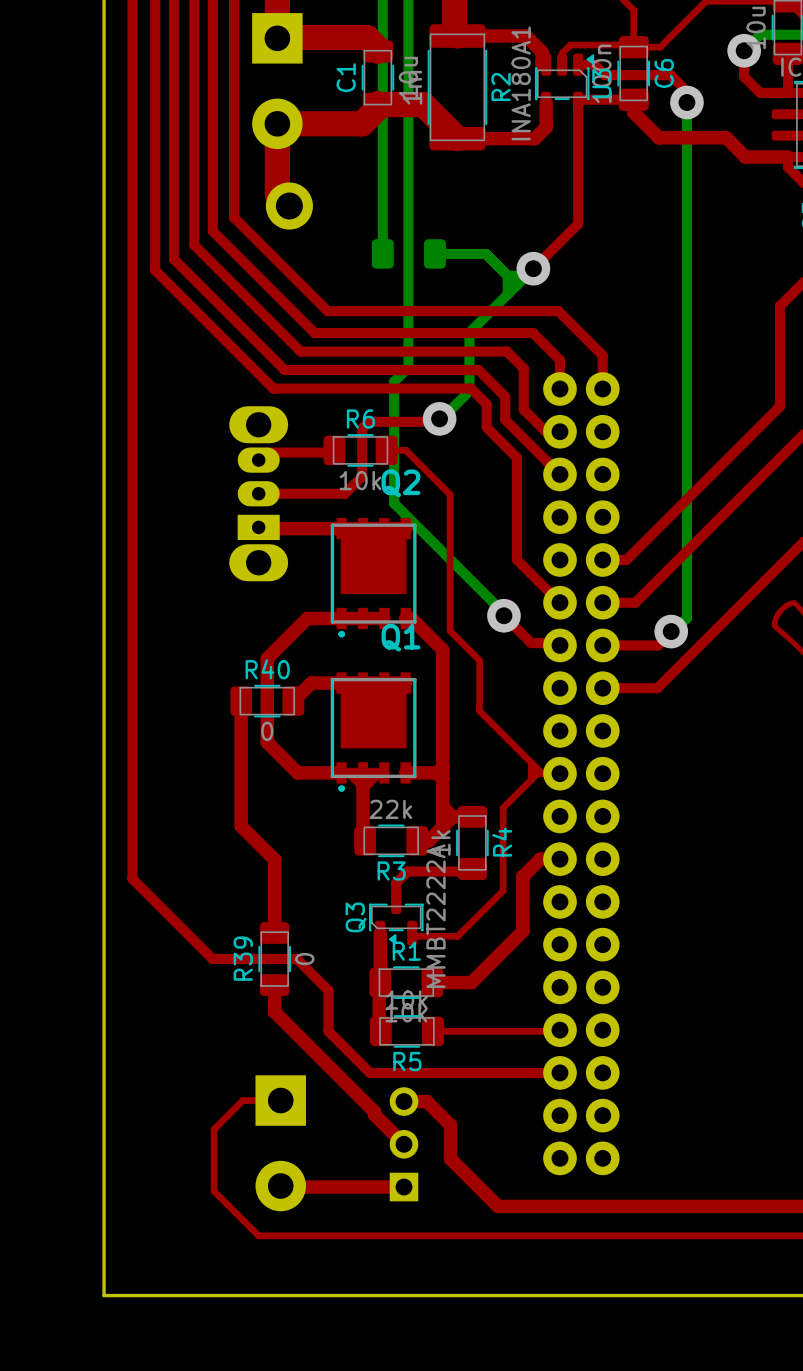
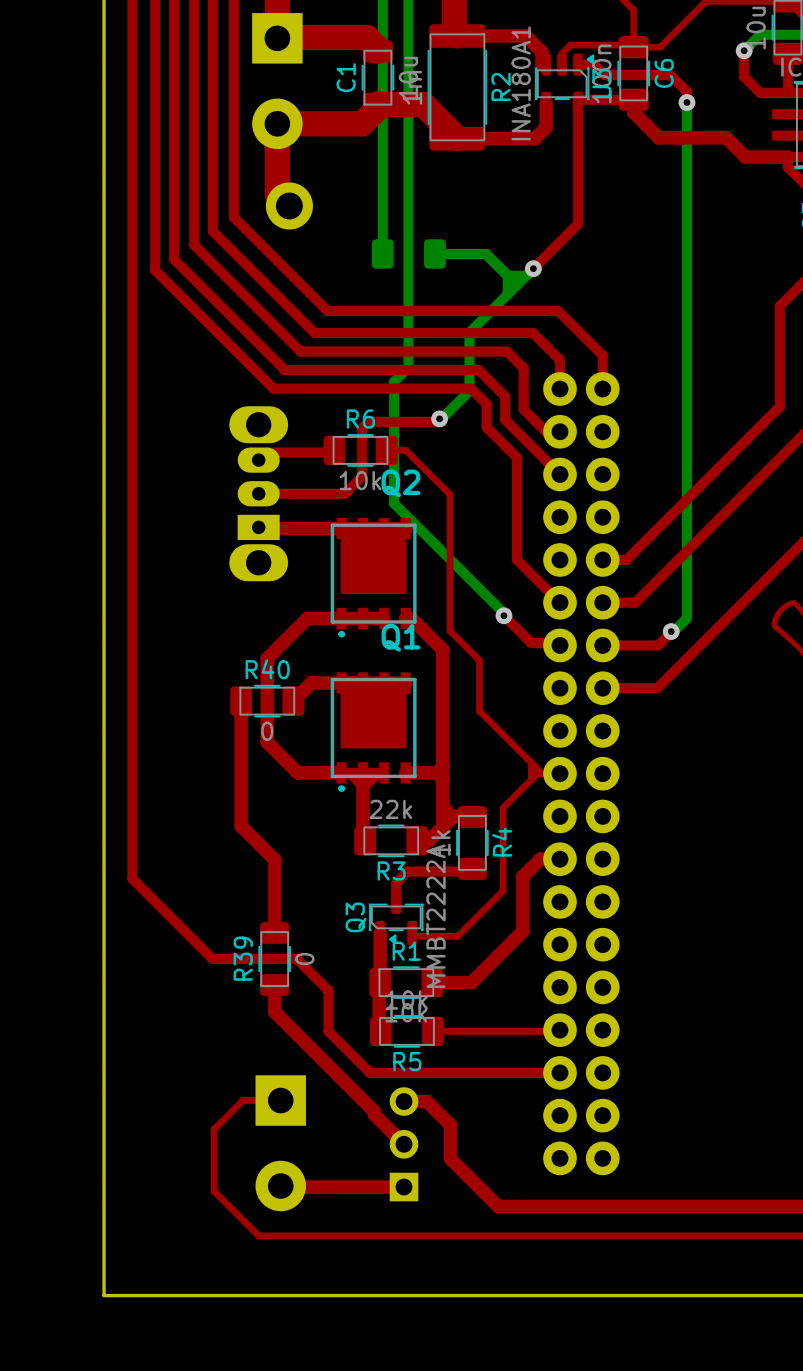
via size: [727, 33, 762, 68] -> [735, 42, 753, 60]
via size: [670, 85, 704, 120] -> [678, 94, 696, 111]
via size: [516, 251, 551, 286] -> [524, 260, 542, 278]
via size: [422, 402, 457, 436] -> [431, 410, 449, 428]
via size: [487, 598, 521, 633] -> [495, 607, 513, 625]
via size: [654, 614, 689, 649] -> [662, 623, 680, 640]

